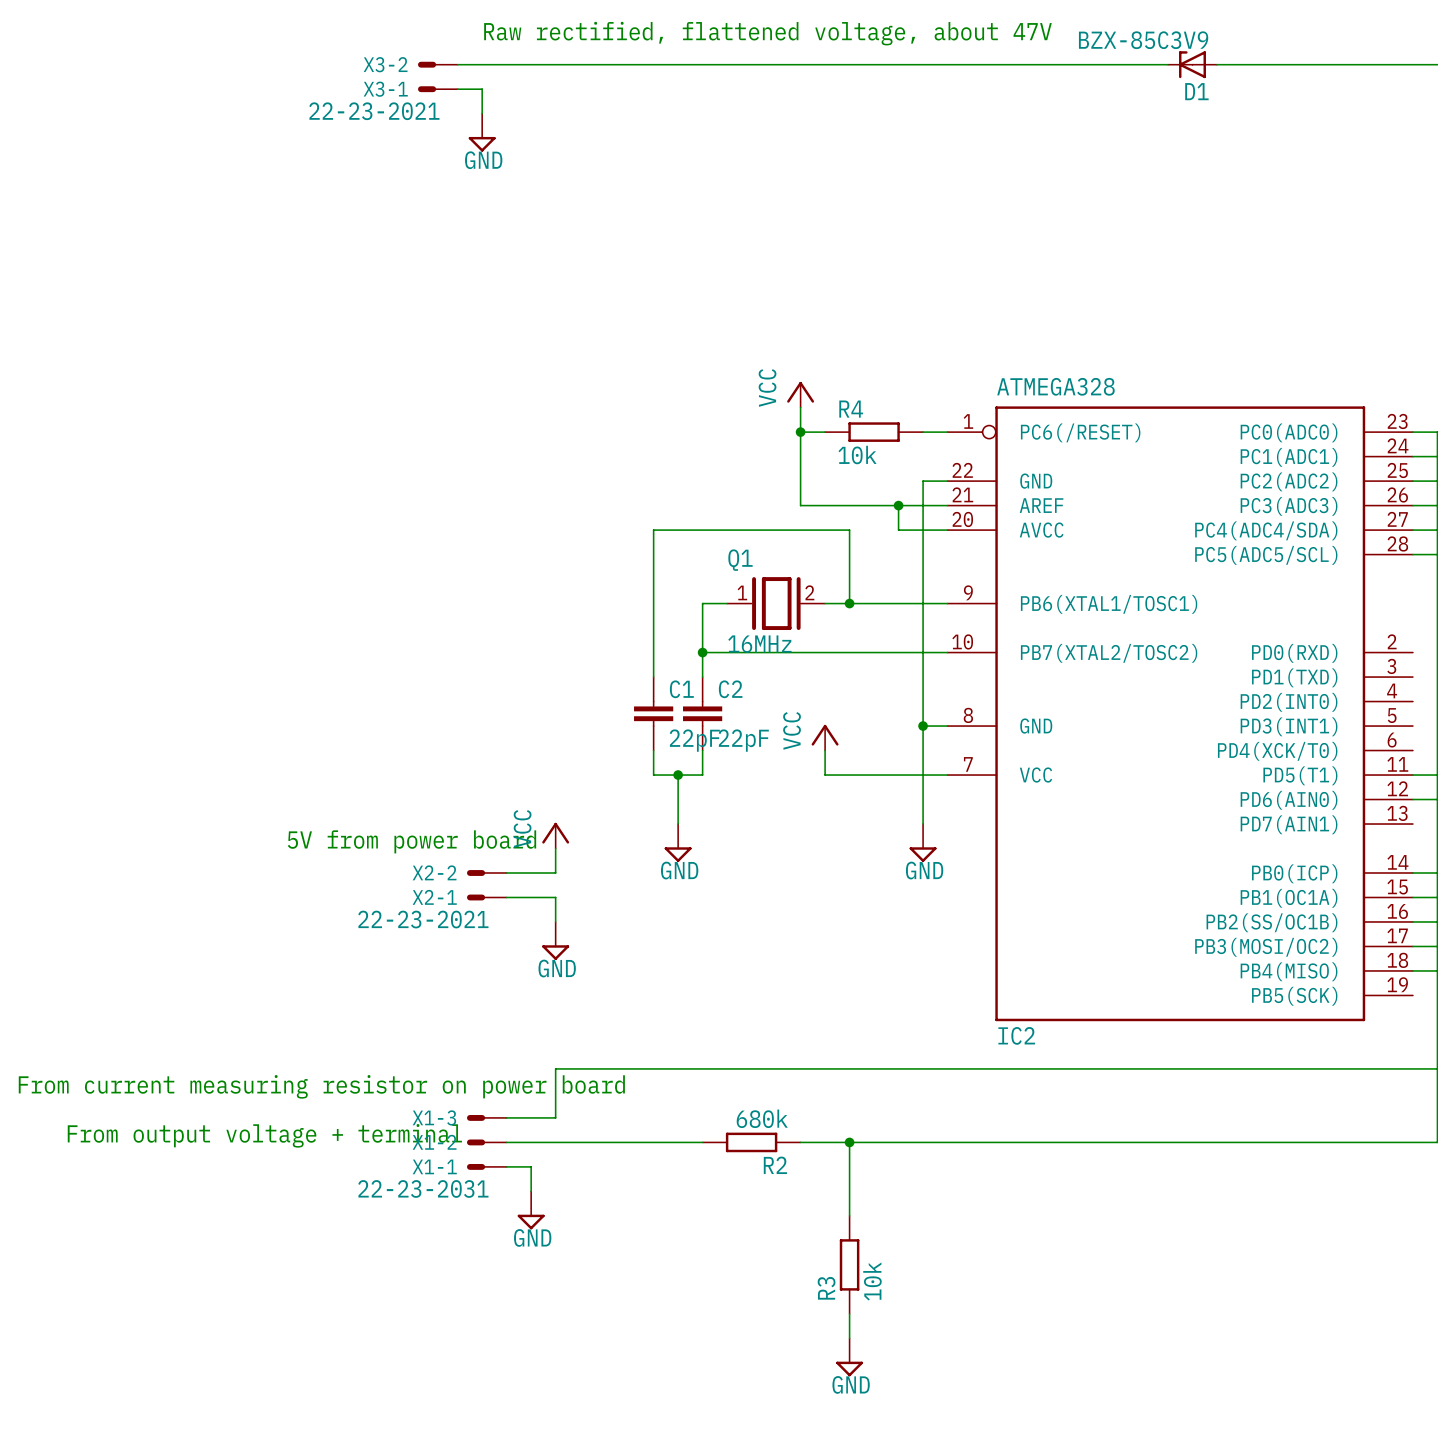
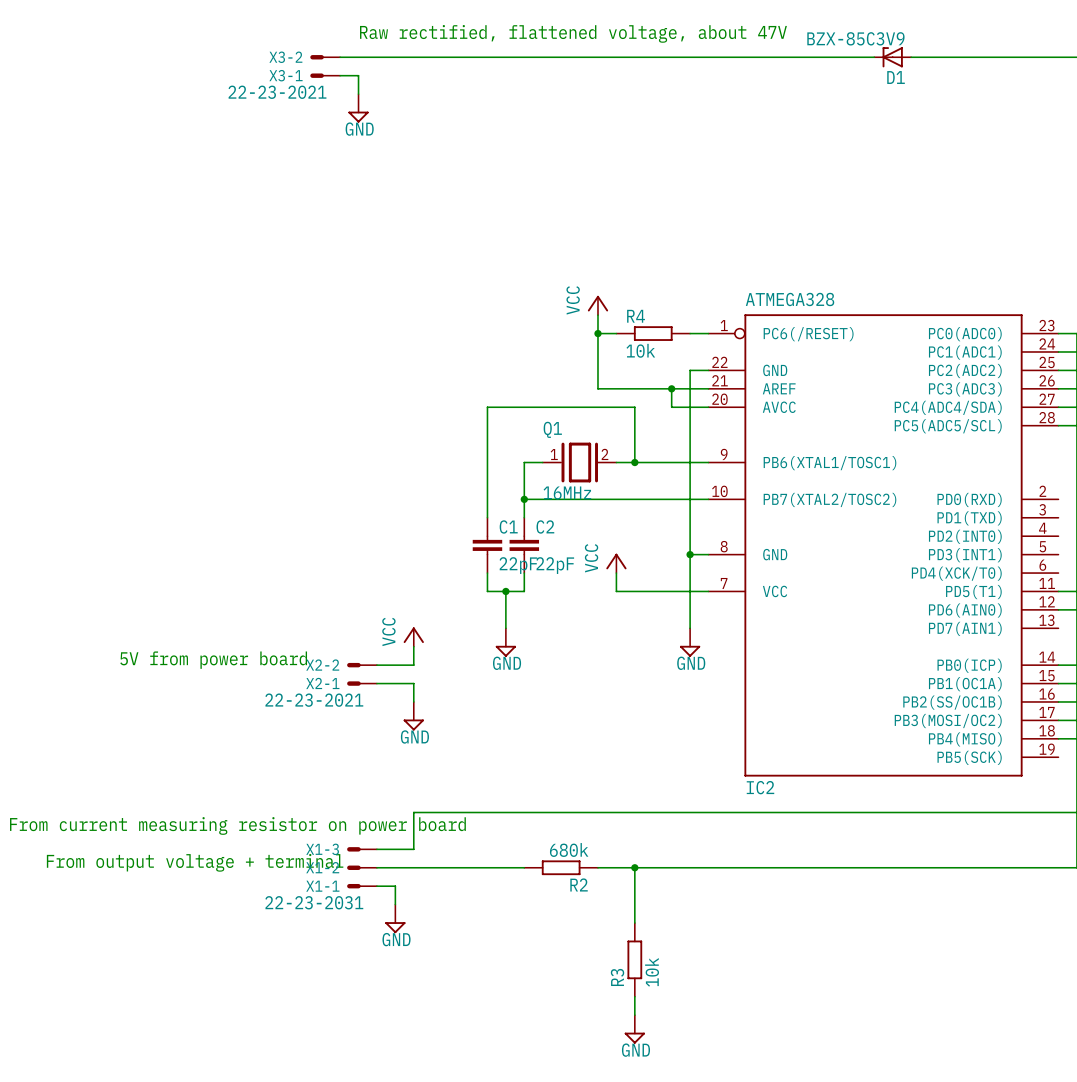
text position: 5V from power board (411, 841) -> 5V from power board (213, 660)

